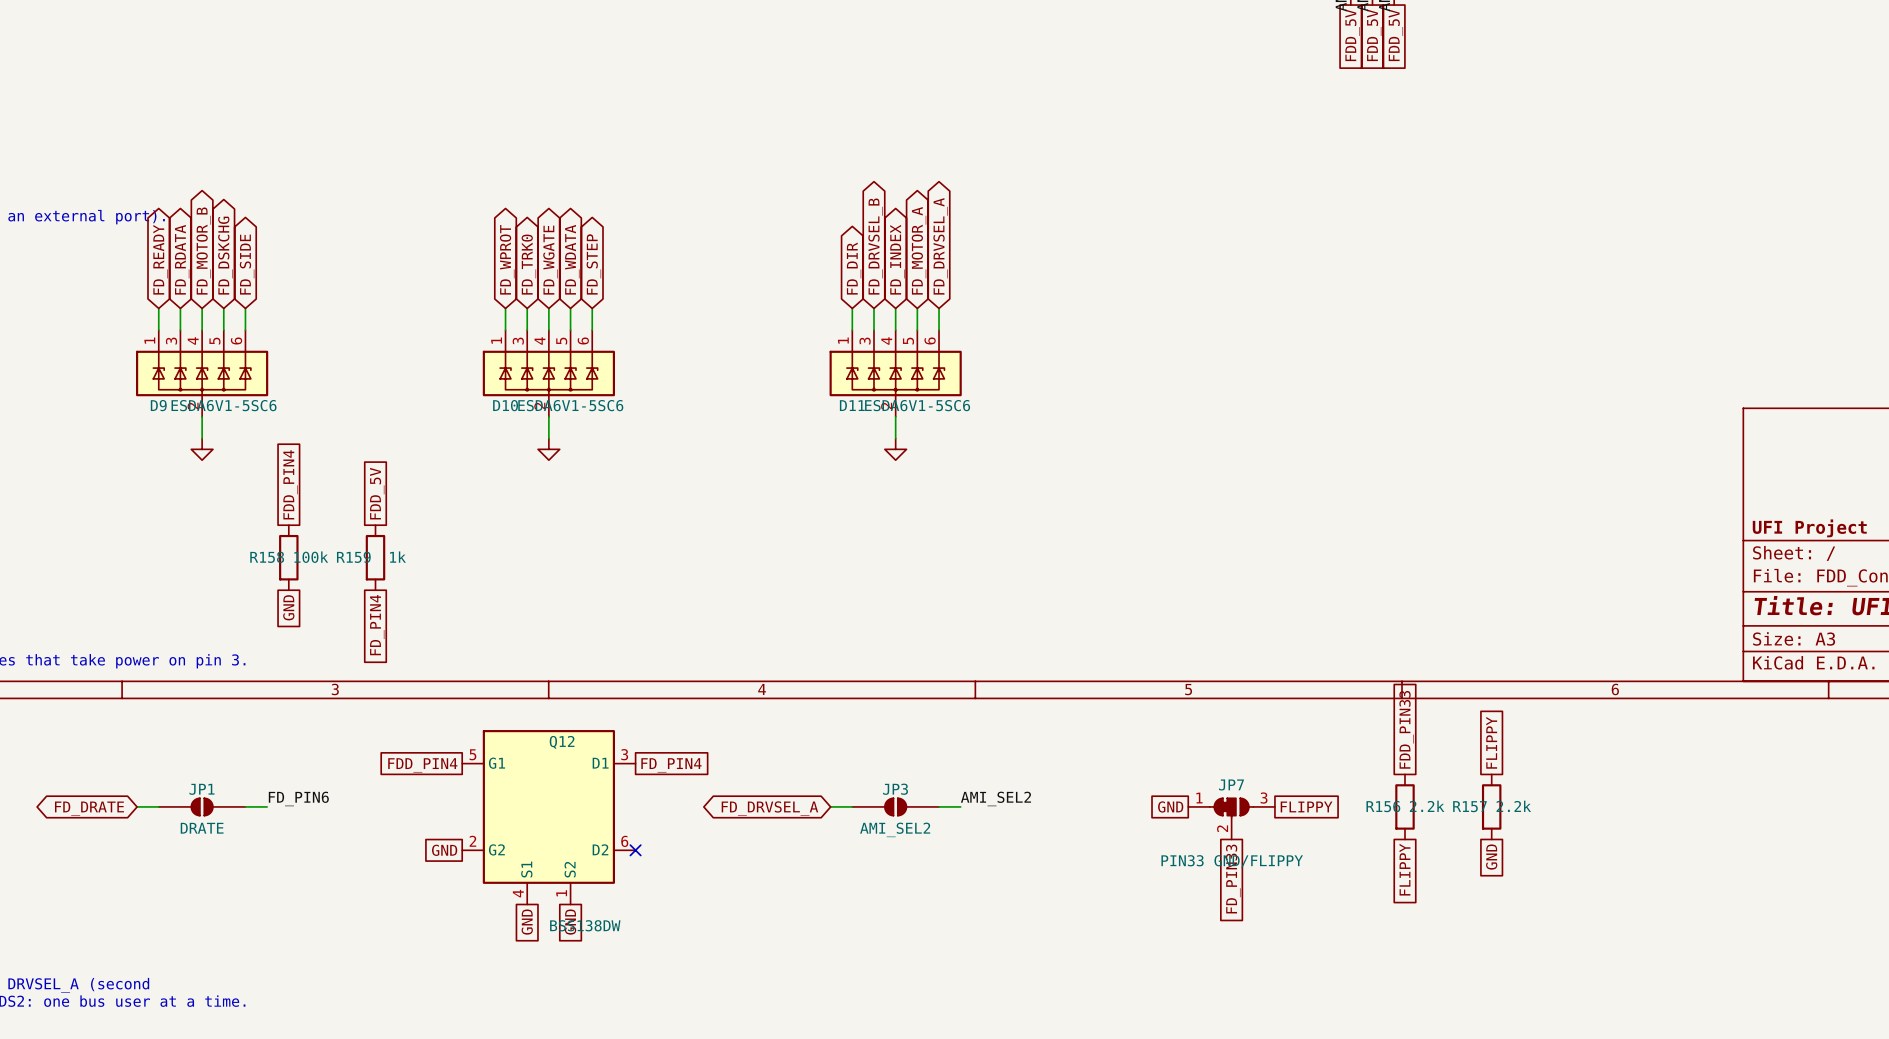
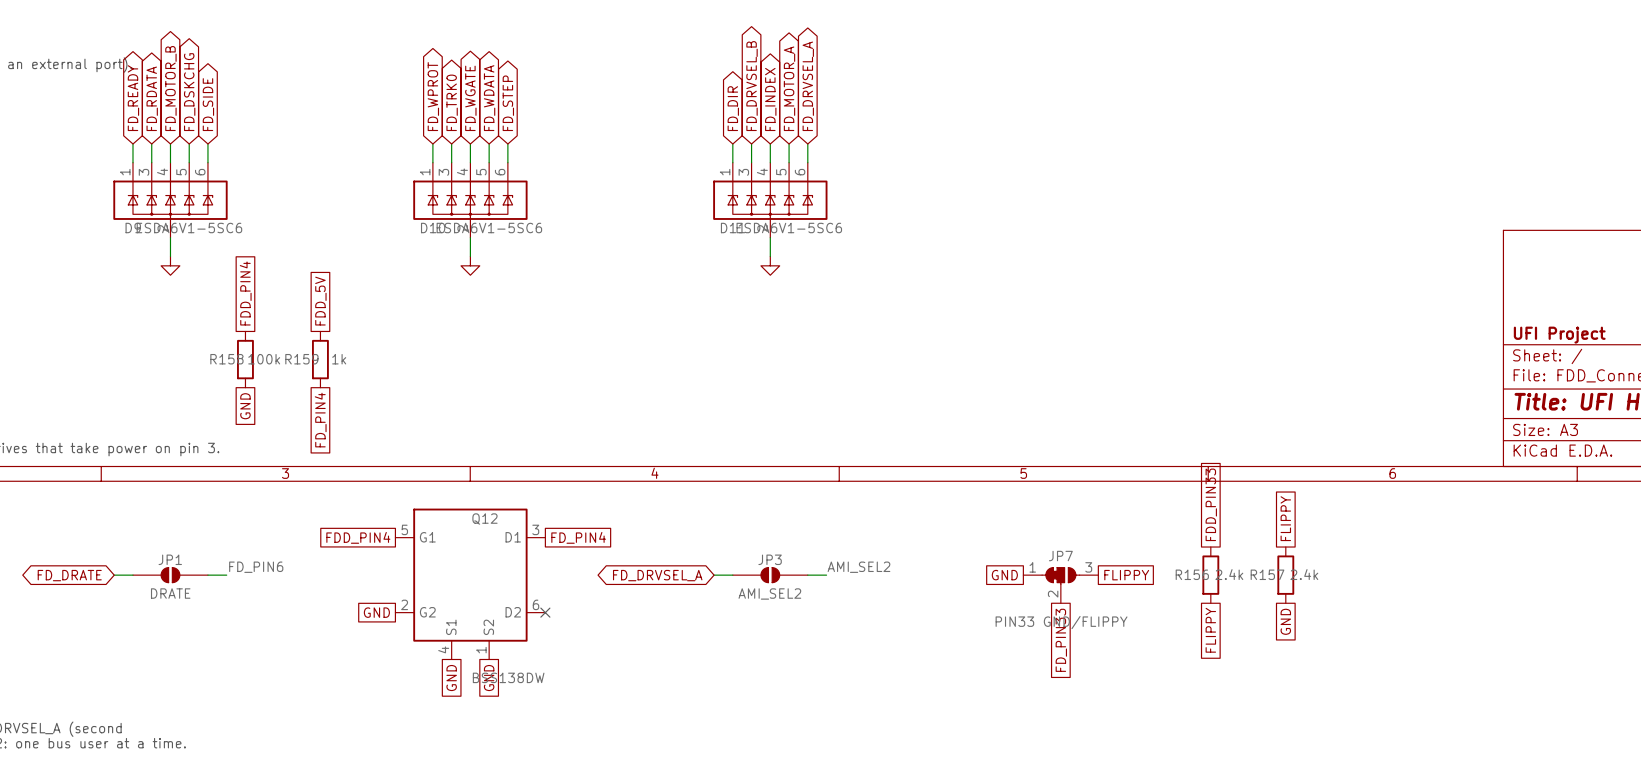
R156 value: 2.2k (1427, 806) -> 2.4k (1229, 574)
R157 value: 2.2k (1513, 806) -> 2.4k (1304, 574)

